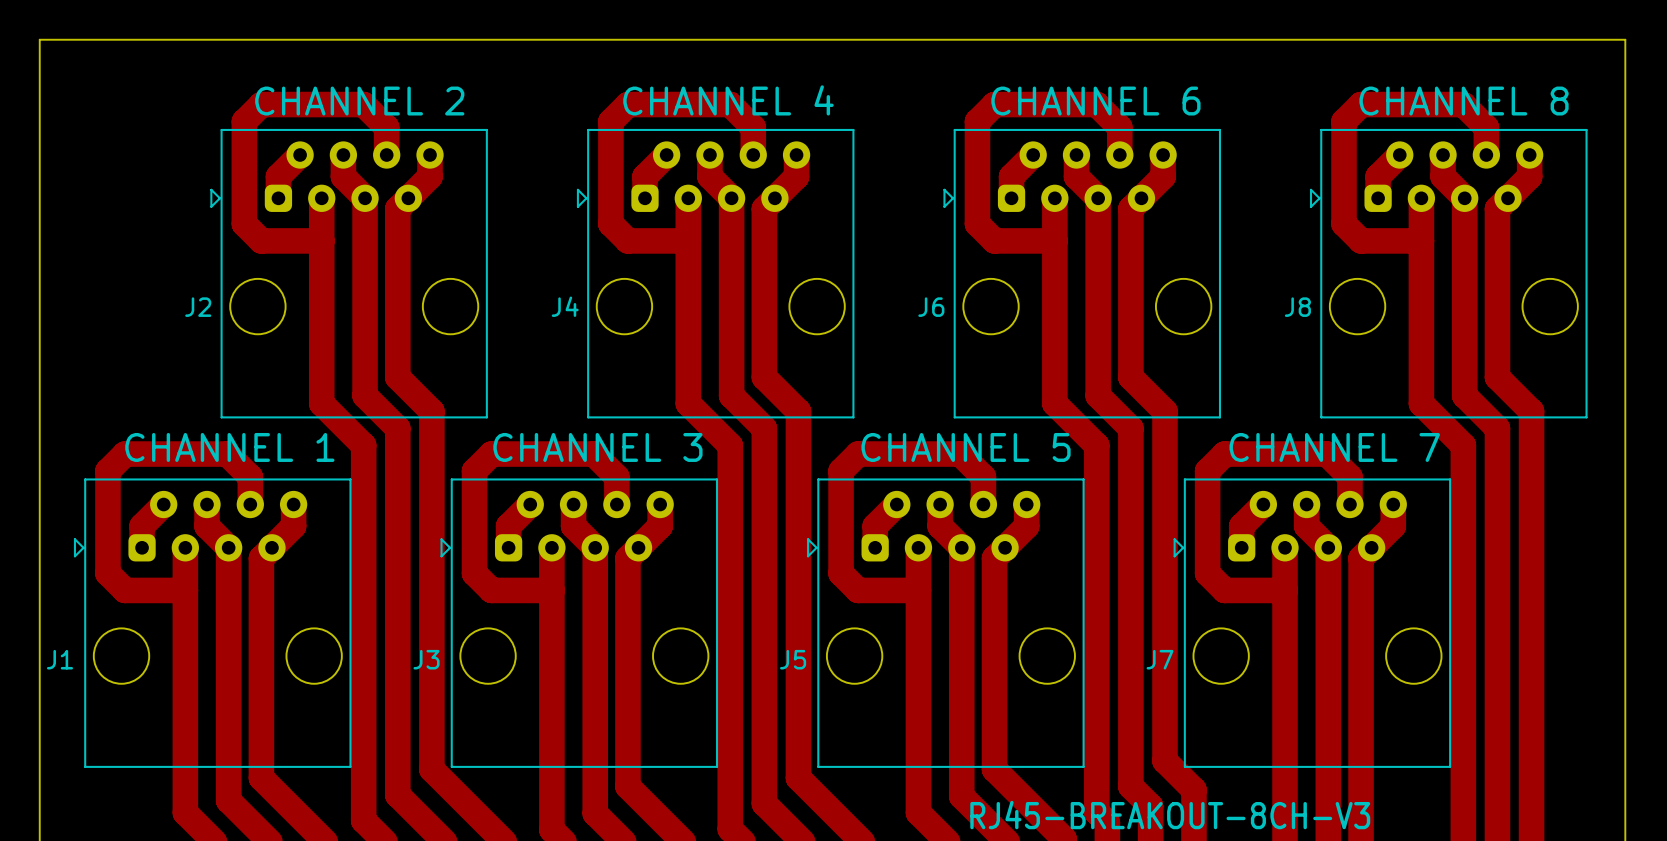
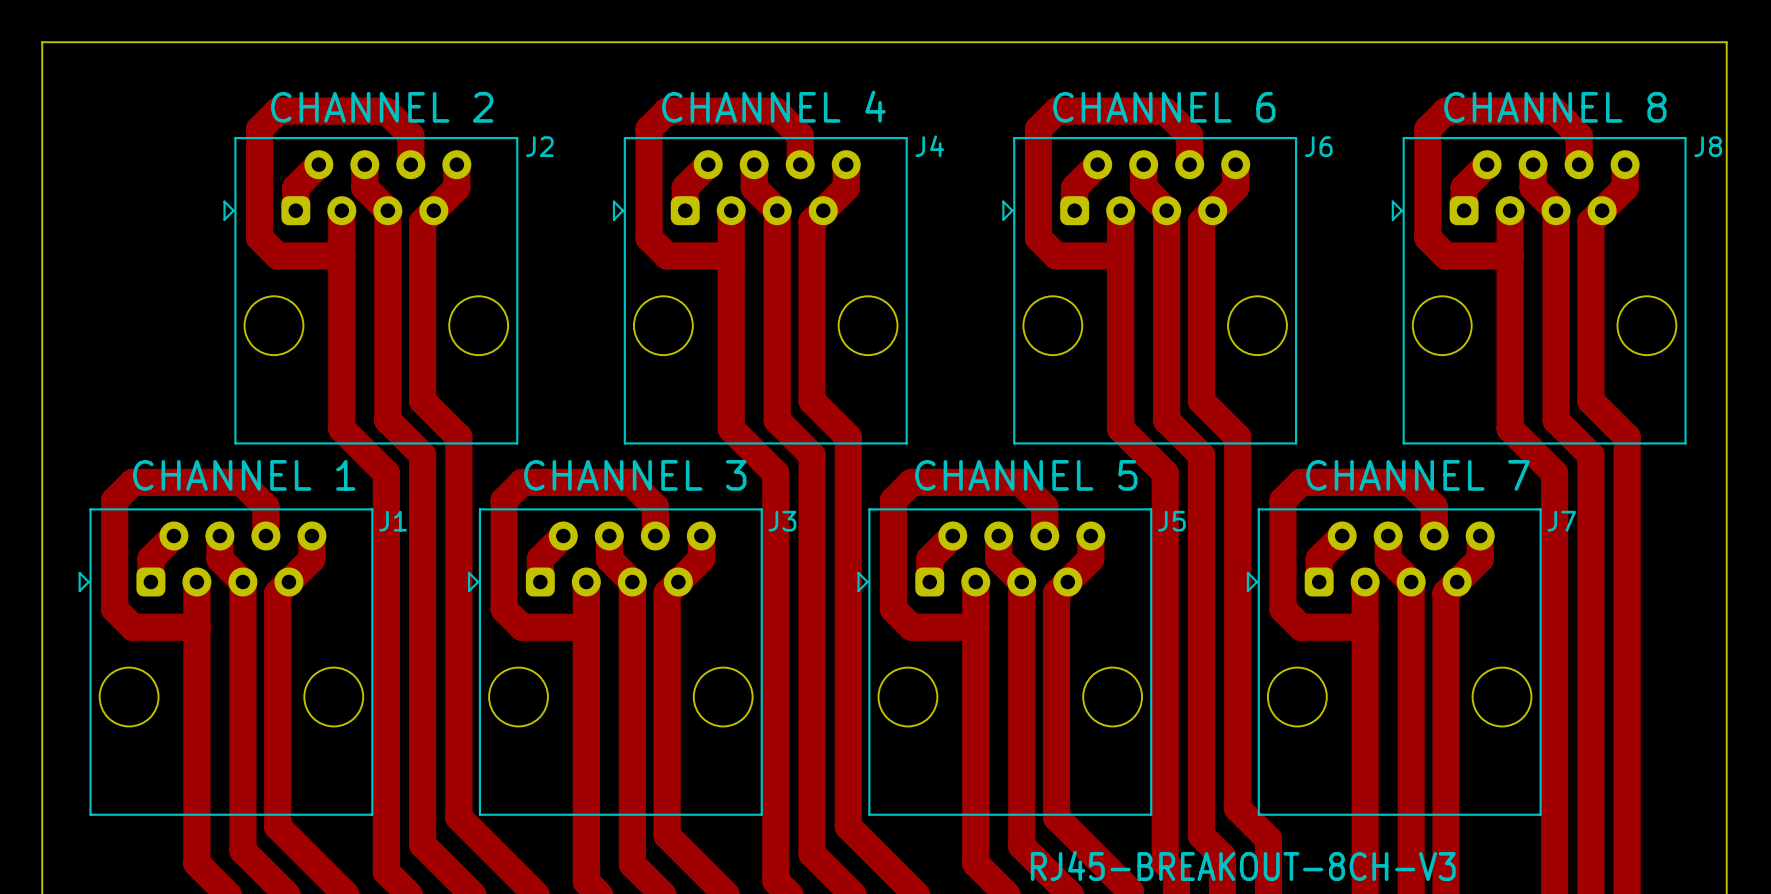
J4 name position: J4 (565, 306) -> J4 (929, 146)
J2 name position: J2 (198, 307) -> J2 (539, 146)
J6 name position: J6 (931, 307) -> J6 (1318, 146)
J8 name position: J8 (1297, 307) -> J8 (1708, 146)
J1 name position: J1 (59, 659) -> J1 (393, 521)
J3 name position: J3 (426, 659) -> J3 (782, 521)
J5 name position: J5 (793, 659) -> J5 (1171, 521)
J7 name position: J7 (1160, 659) -> J7 (1561, 521)

